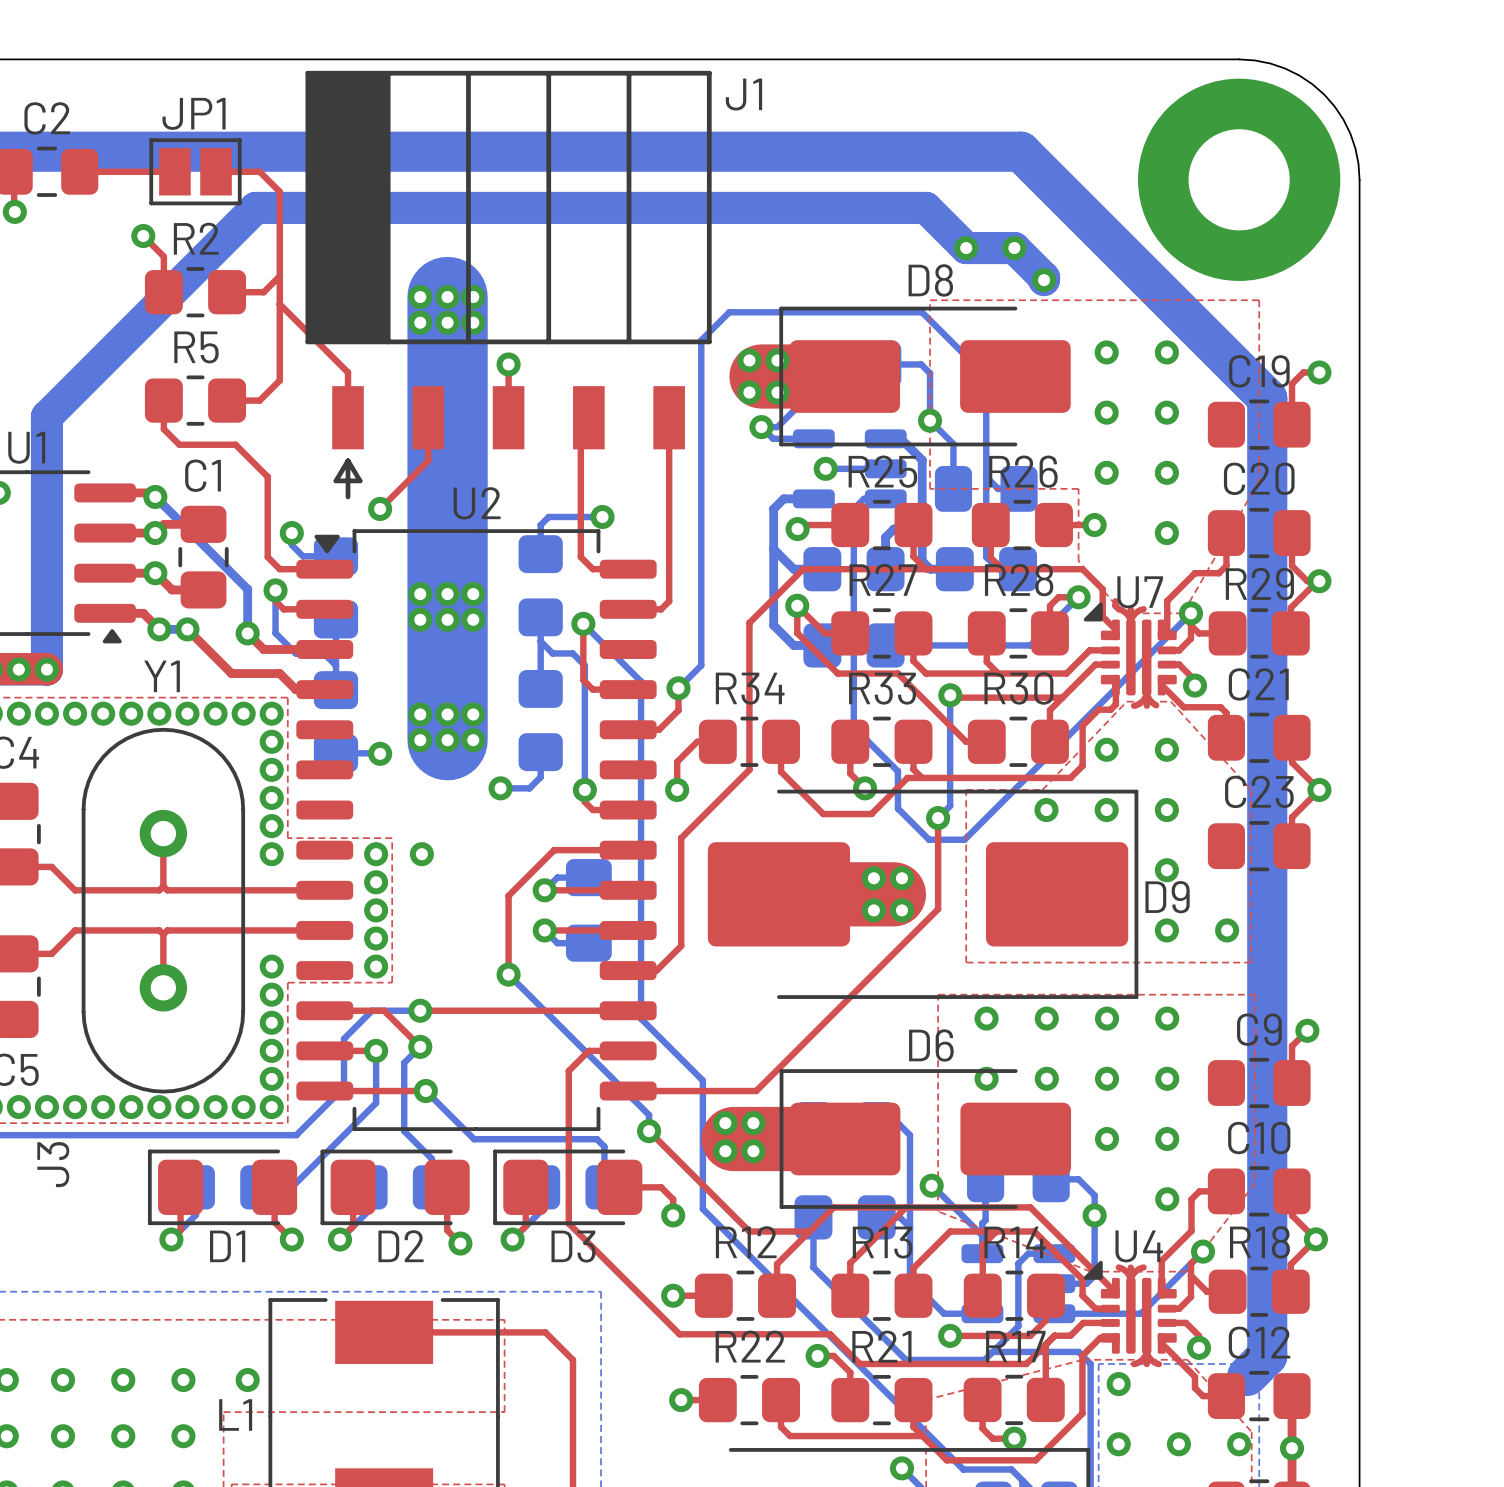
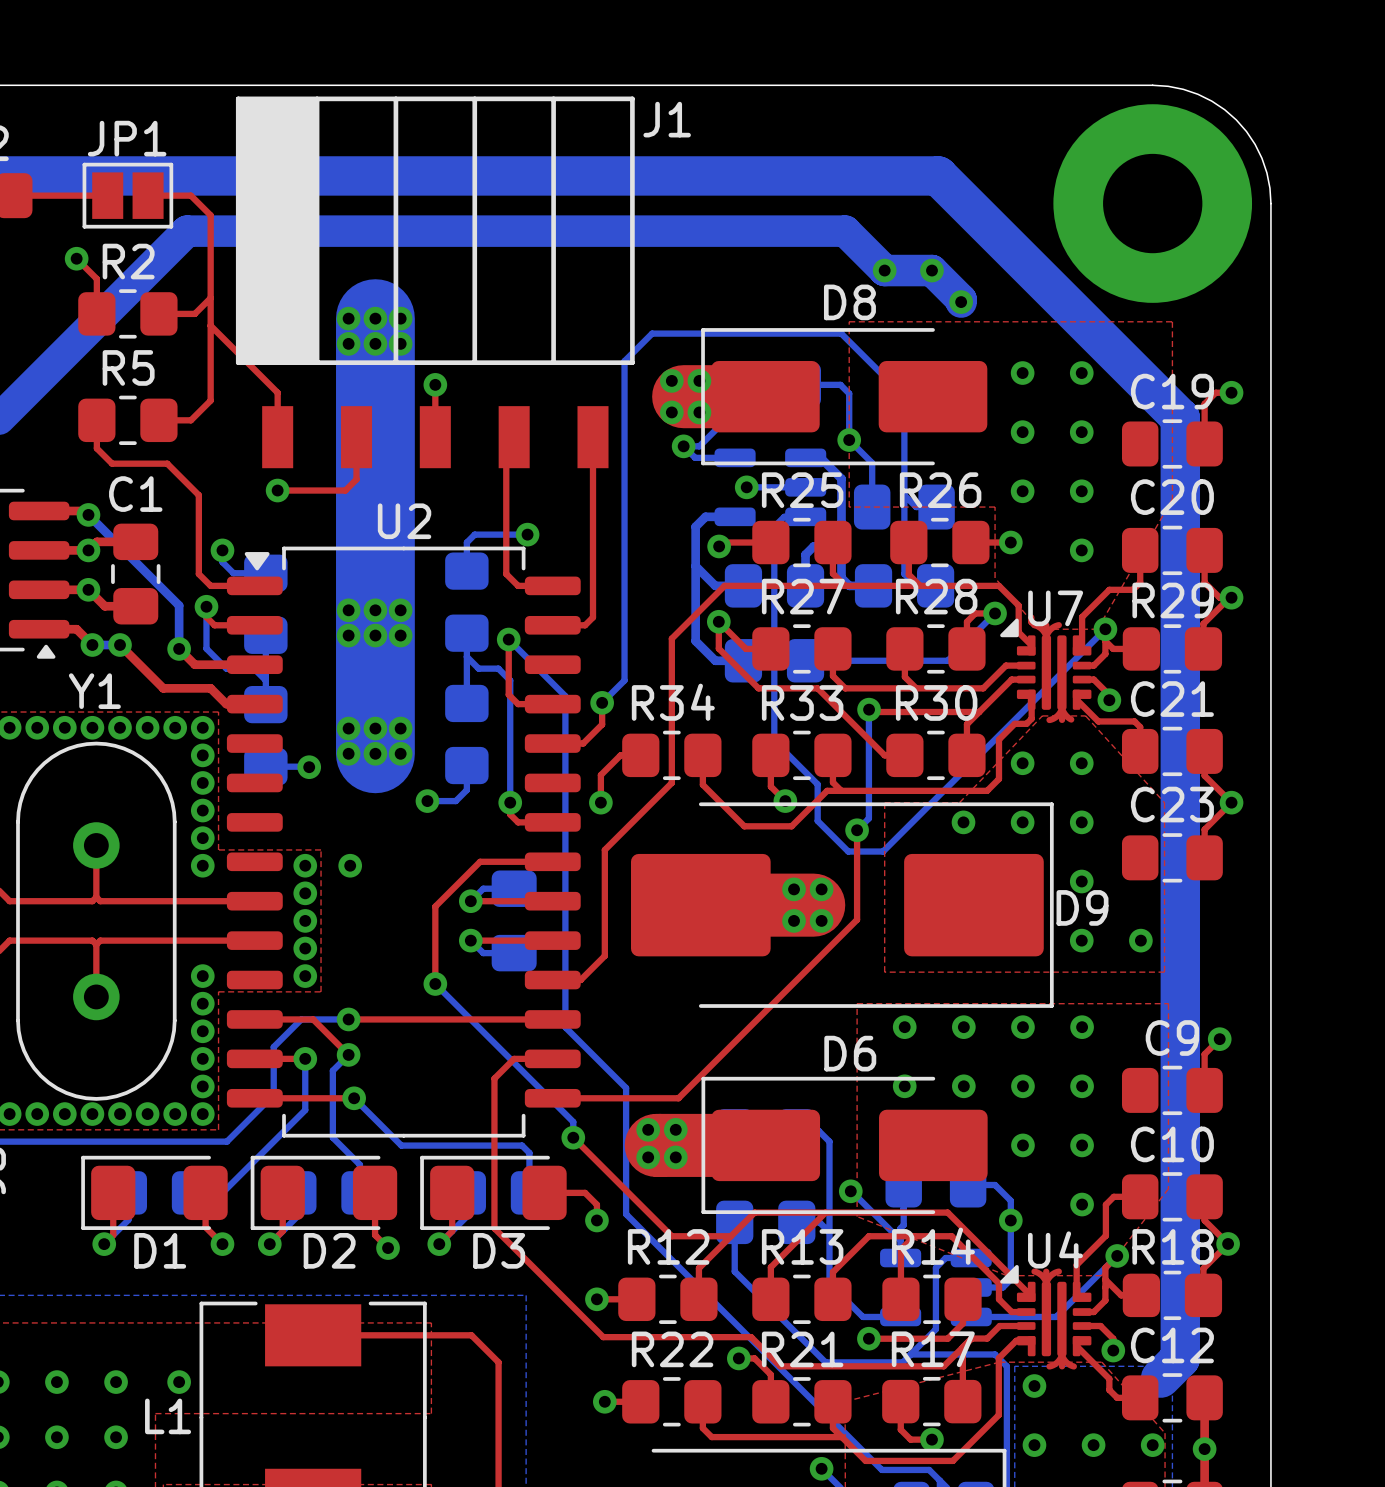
line: (348, 460) (335, 480) (360, 480) (348, 460) -> none
line: (348, 460) (348, 496) -> none
top track: (417, 472) (380, 508) -> (345, 490) (277, 490)
via position: (380, 508) -> (277, 490)

